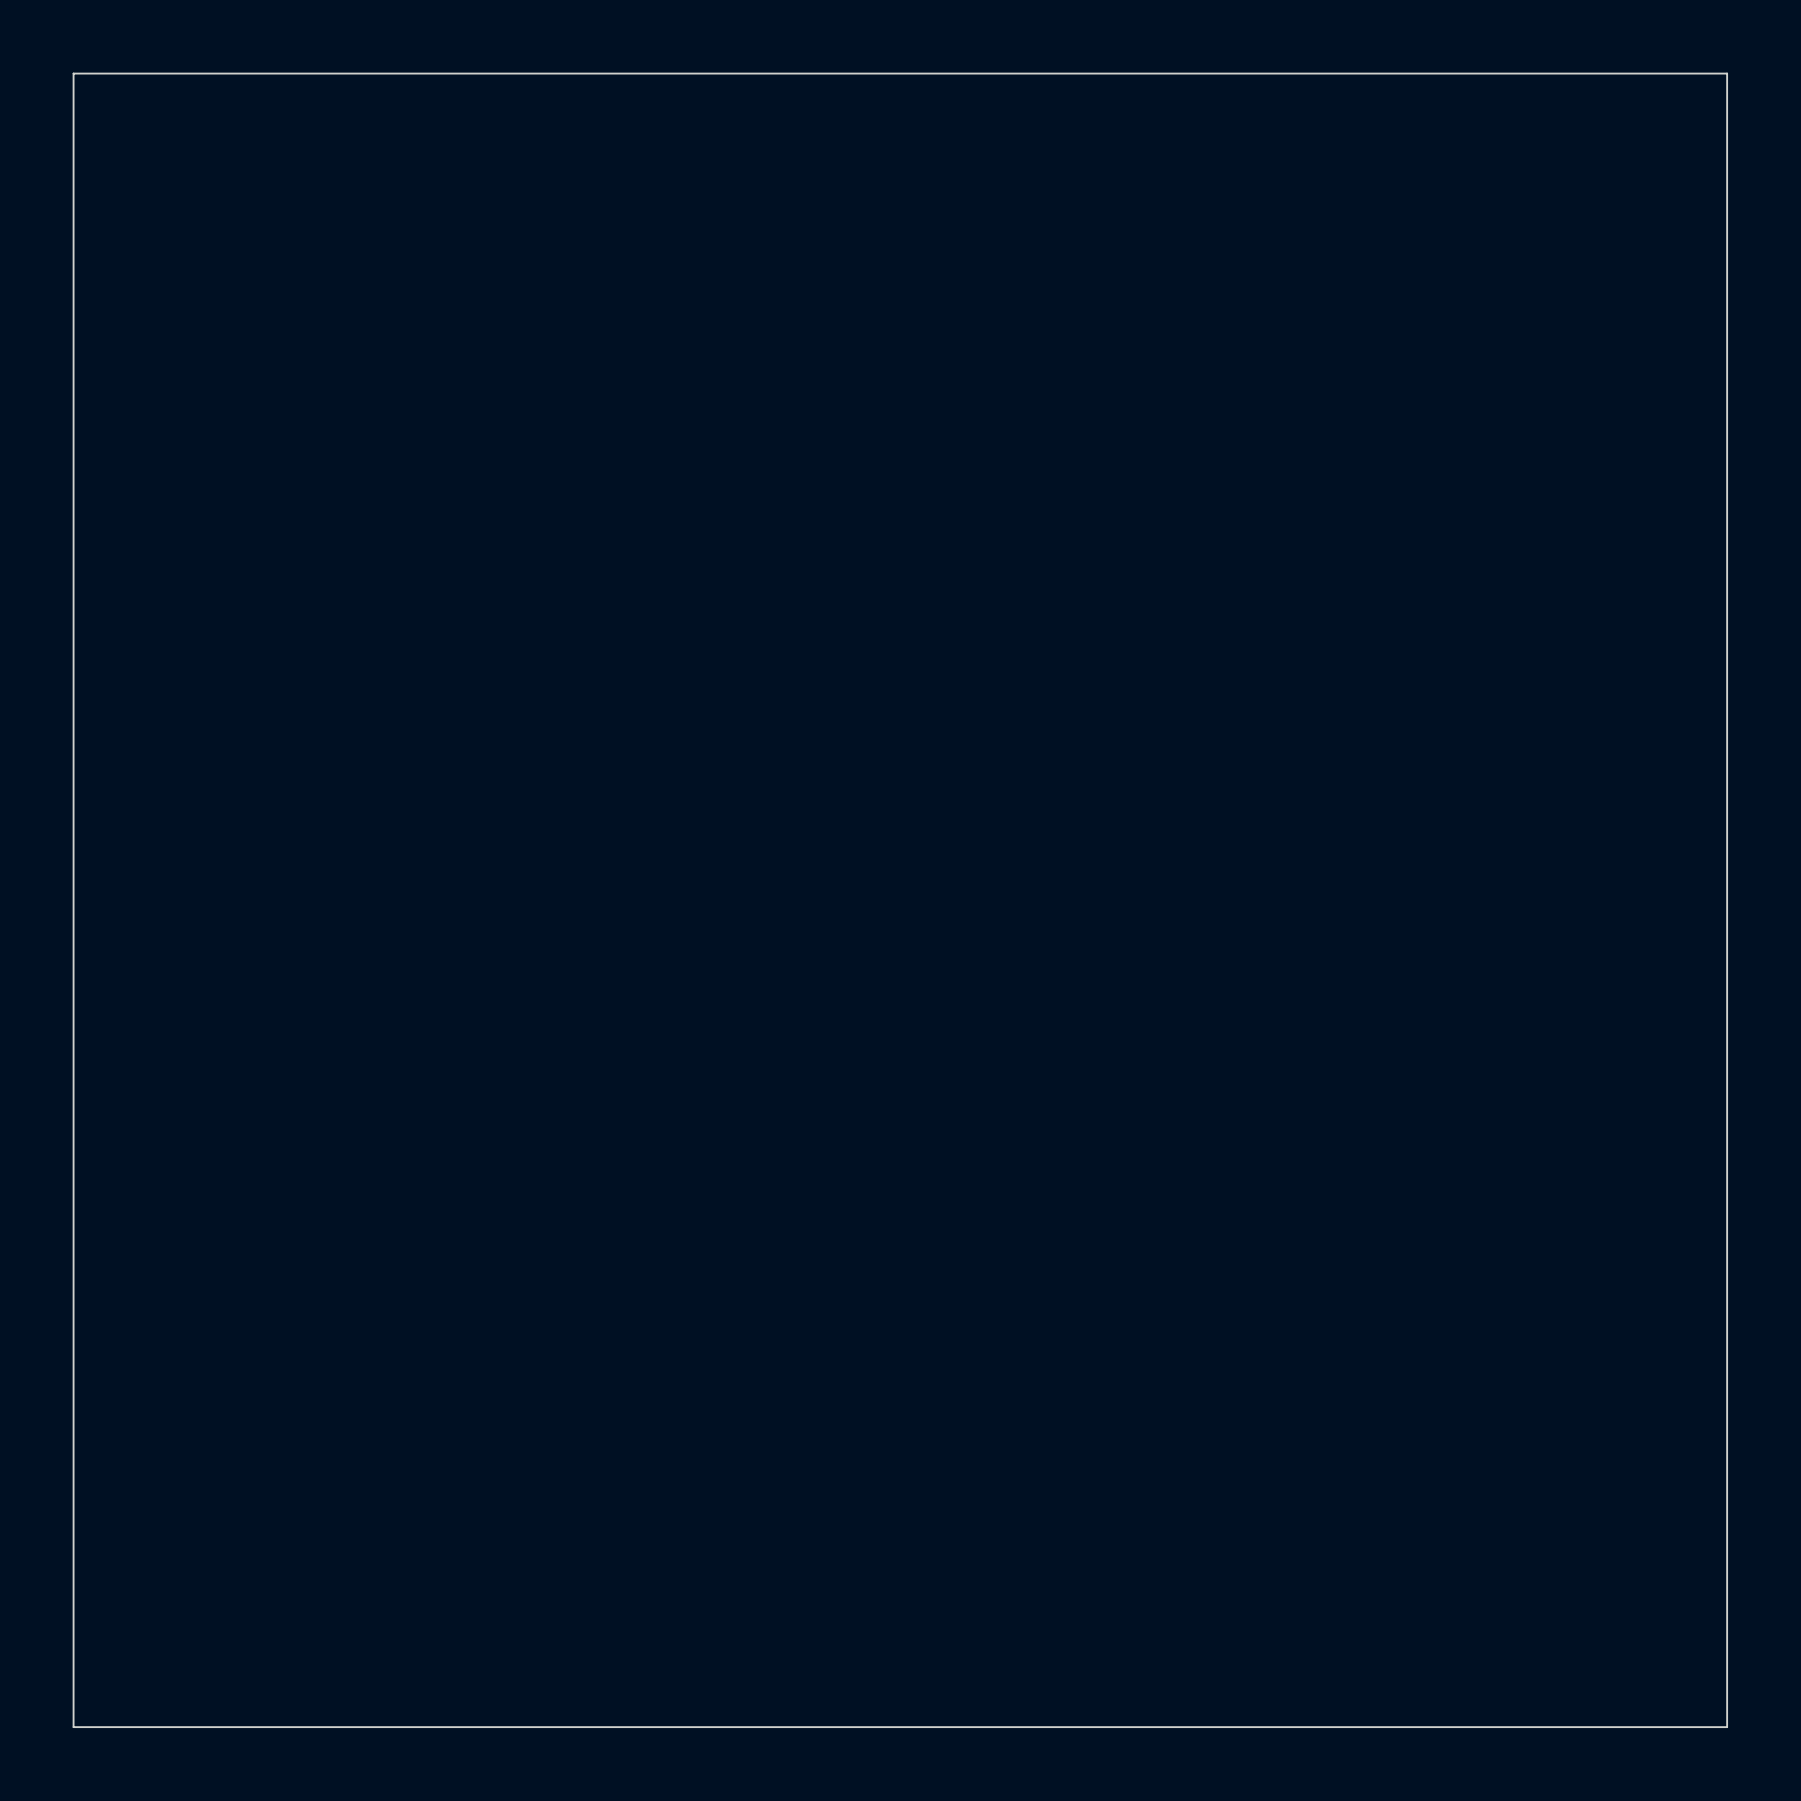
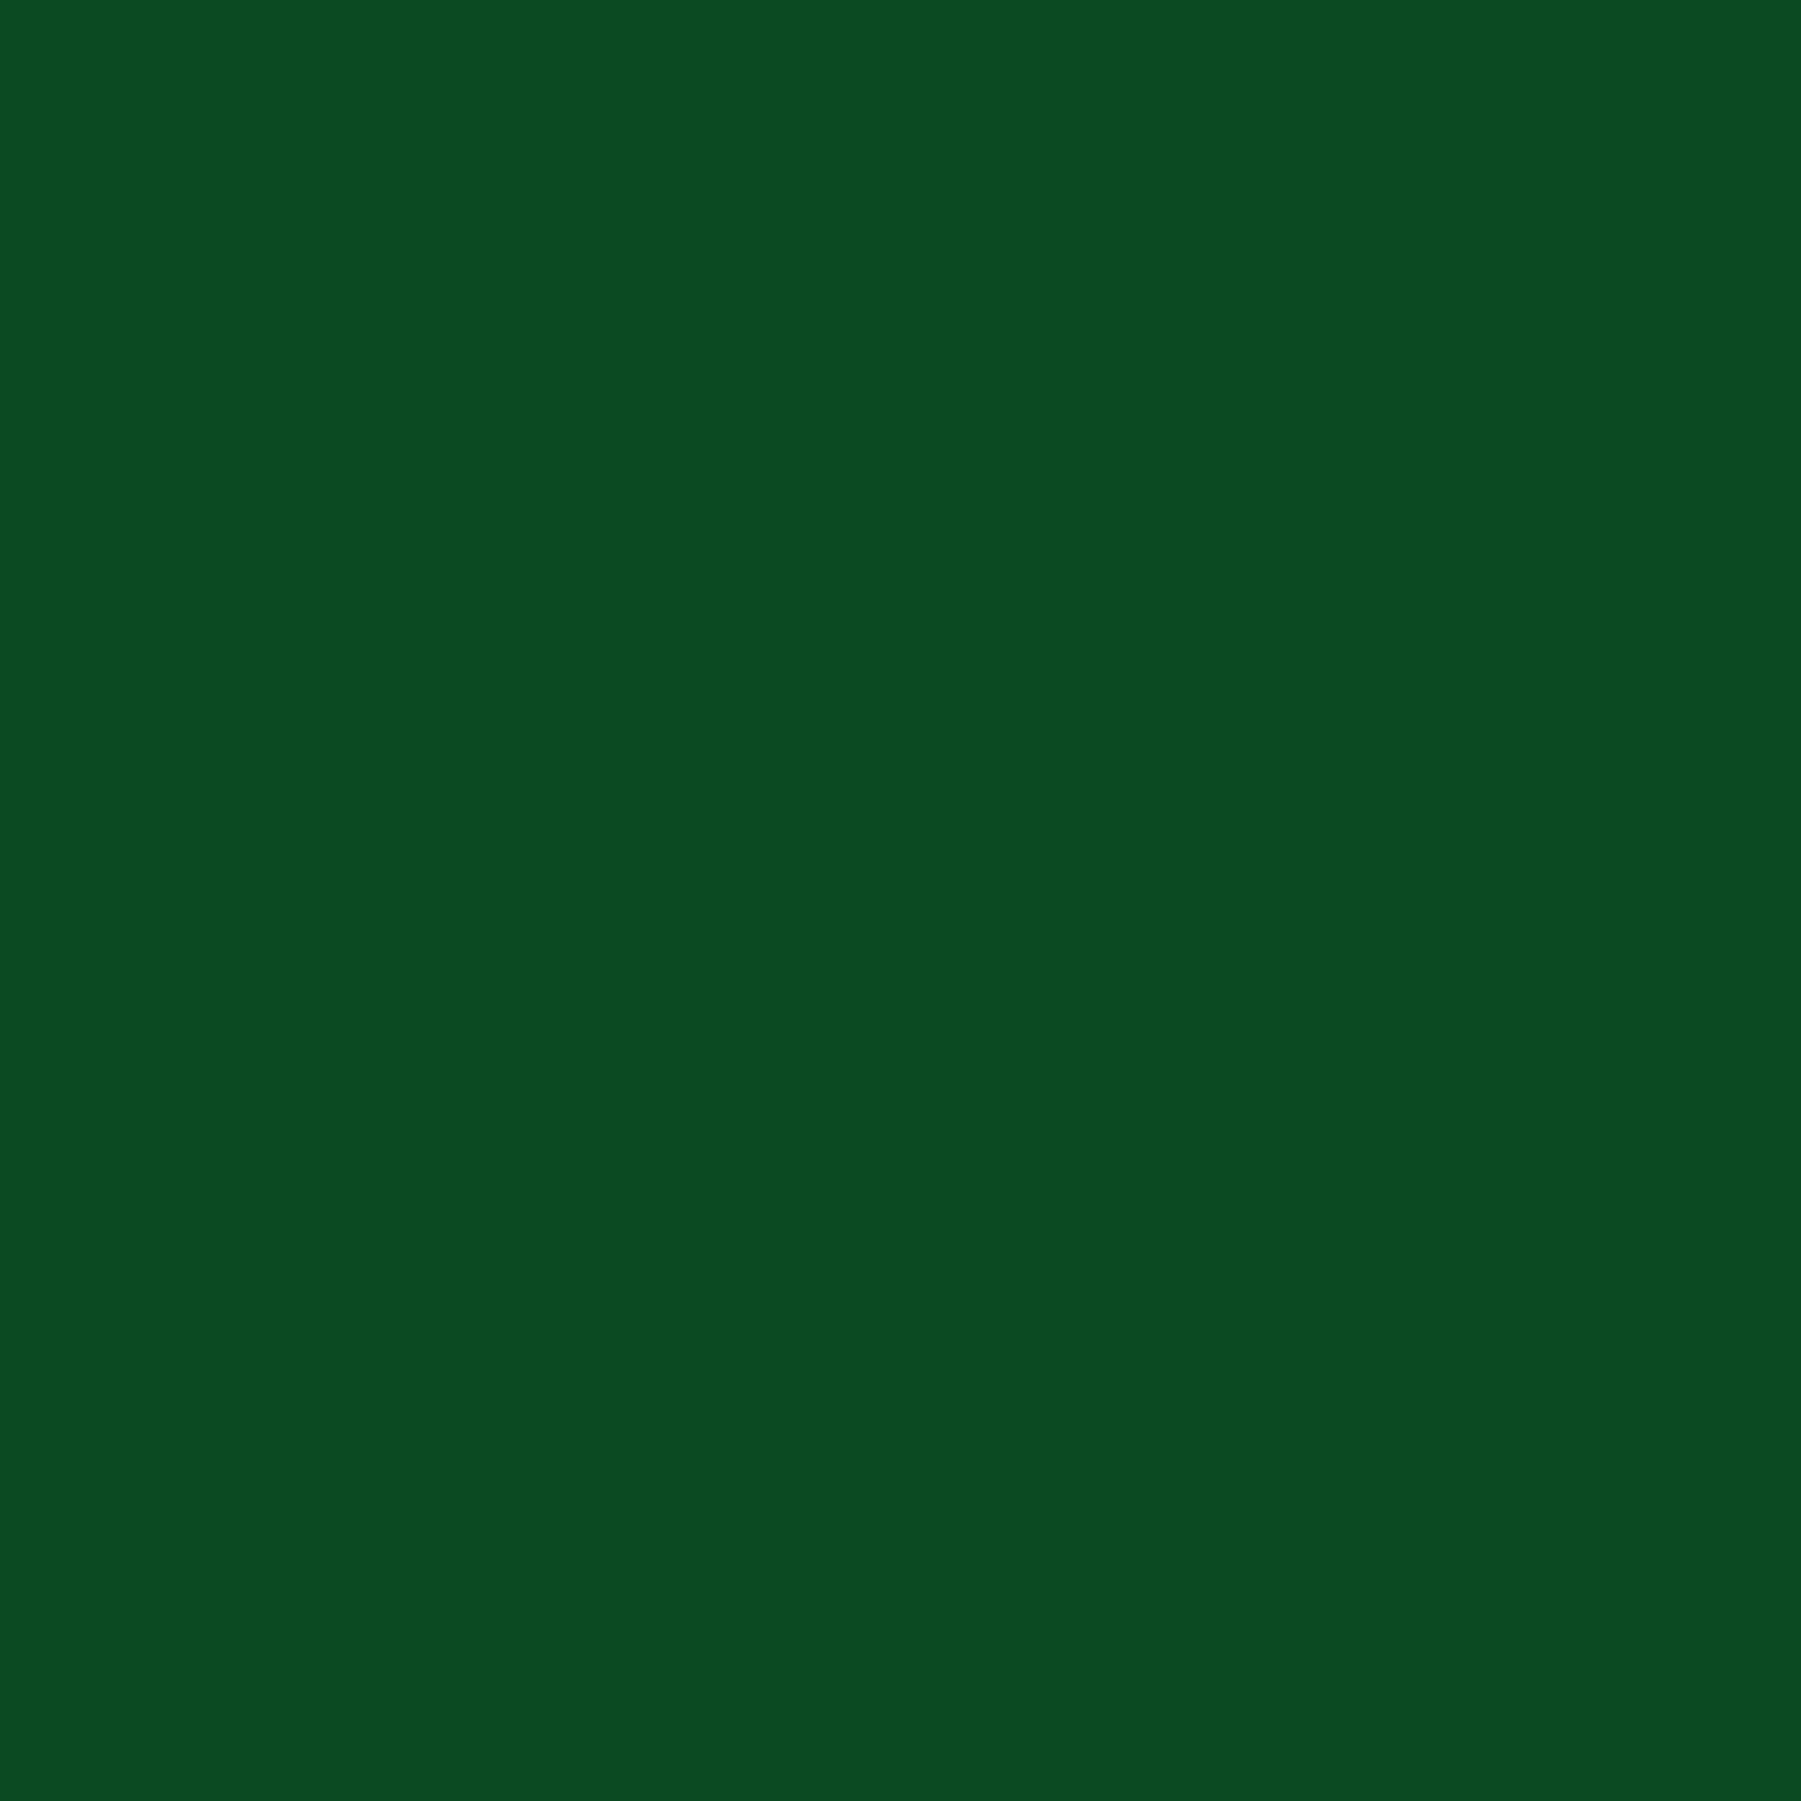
board edge: (73, 73) (1727, 73) (1727, 1727) (73, 1727) (73, 73) -> none

